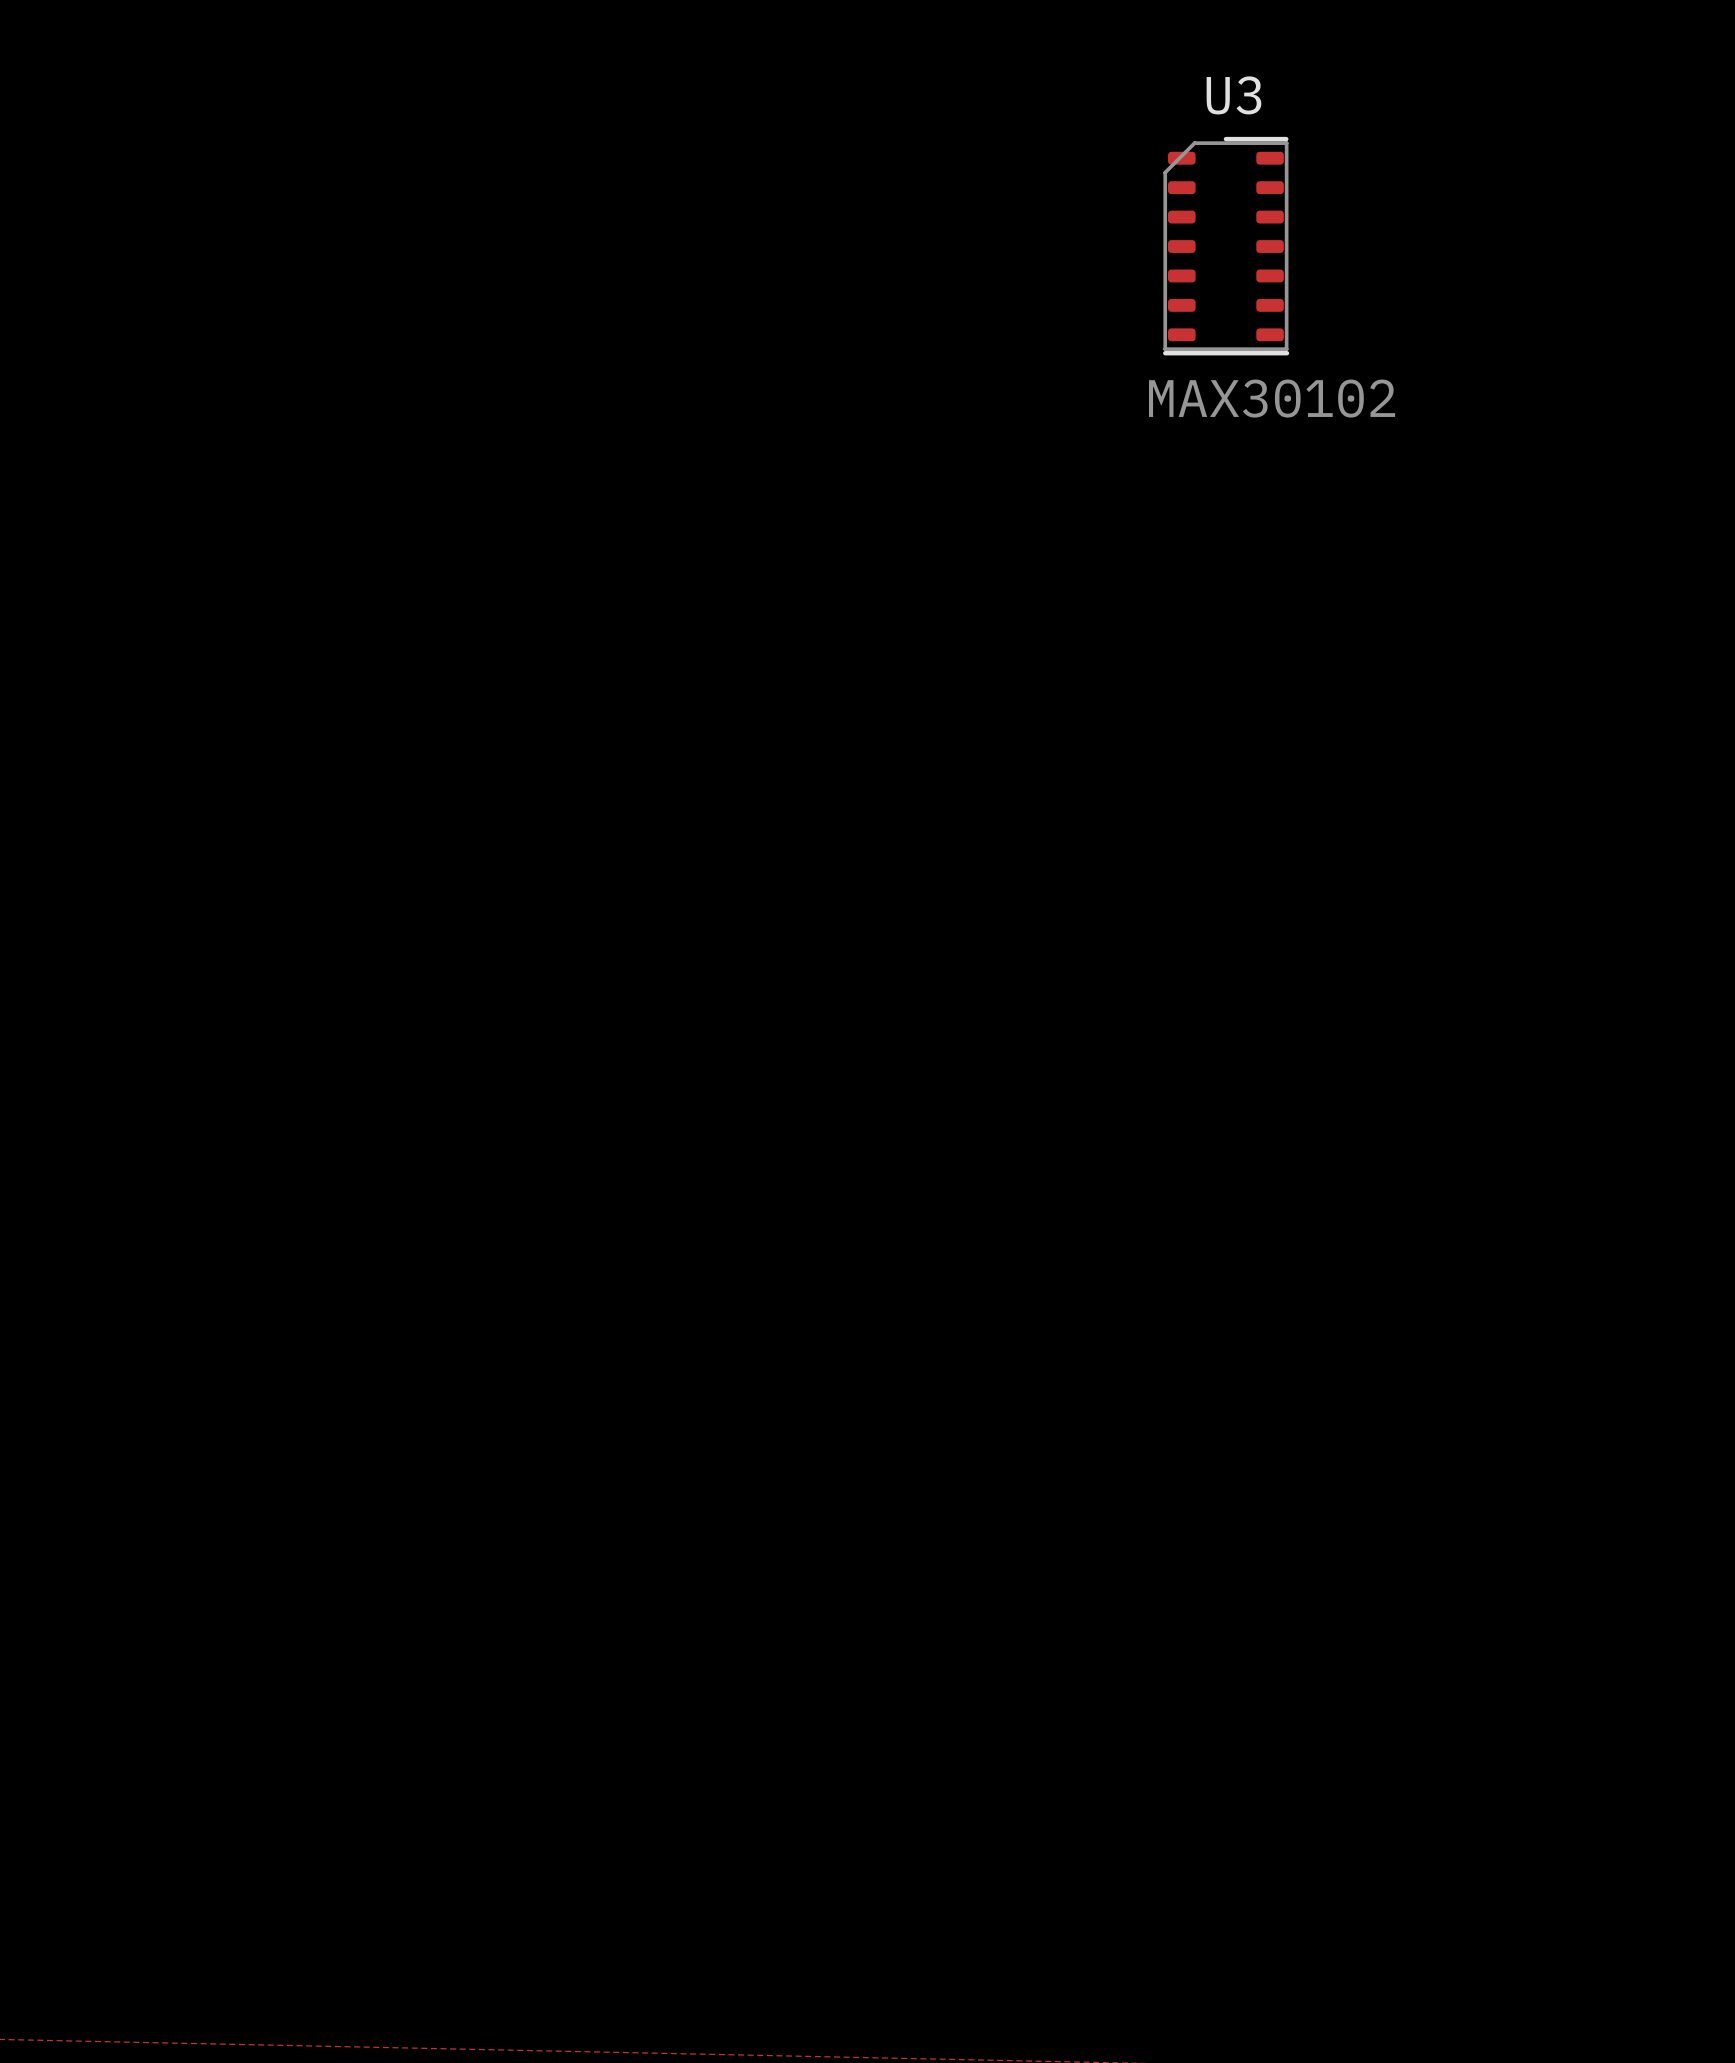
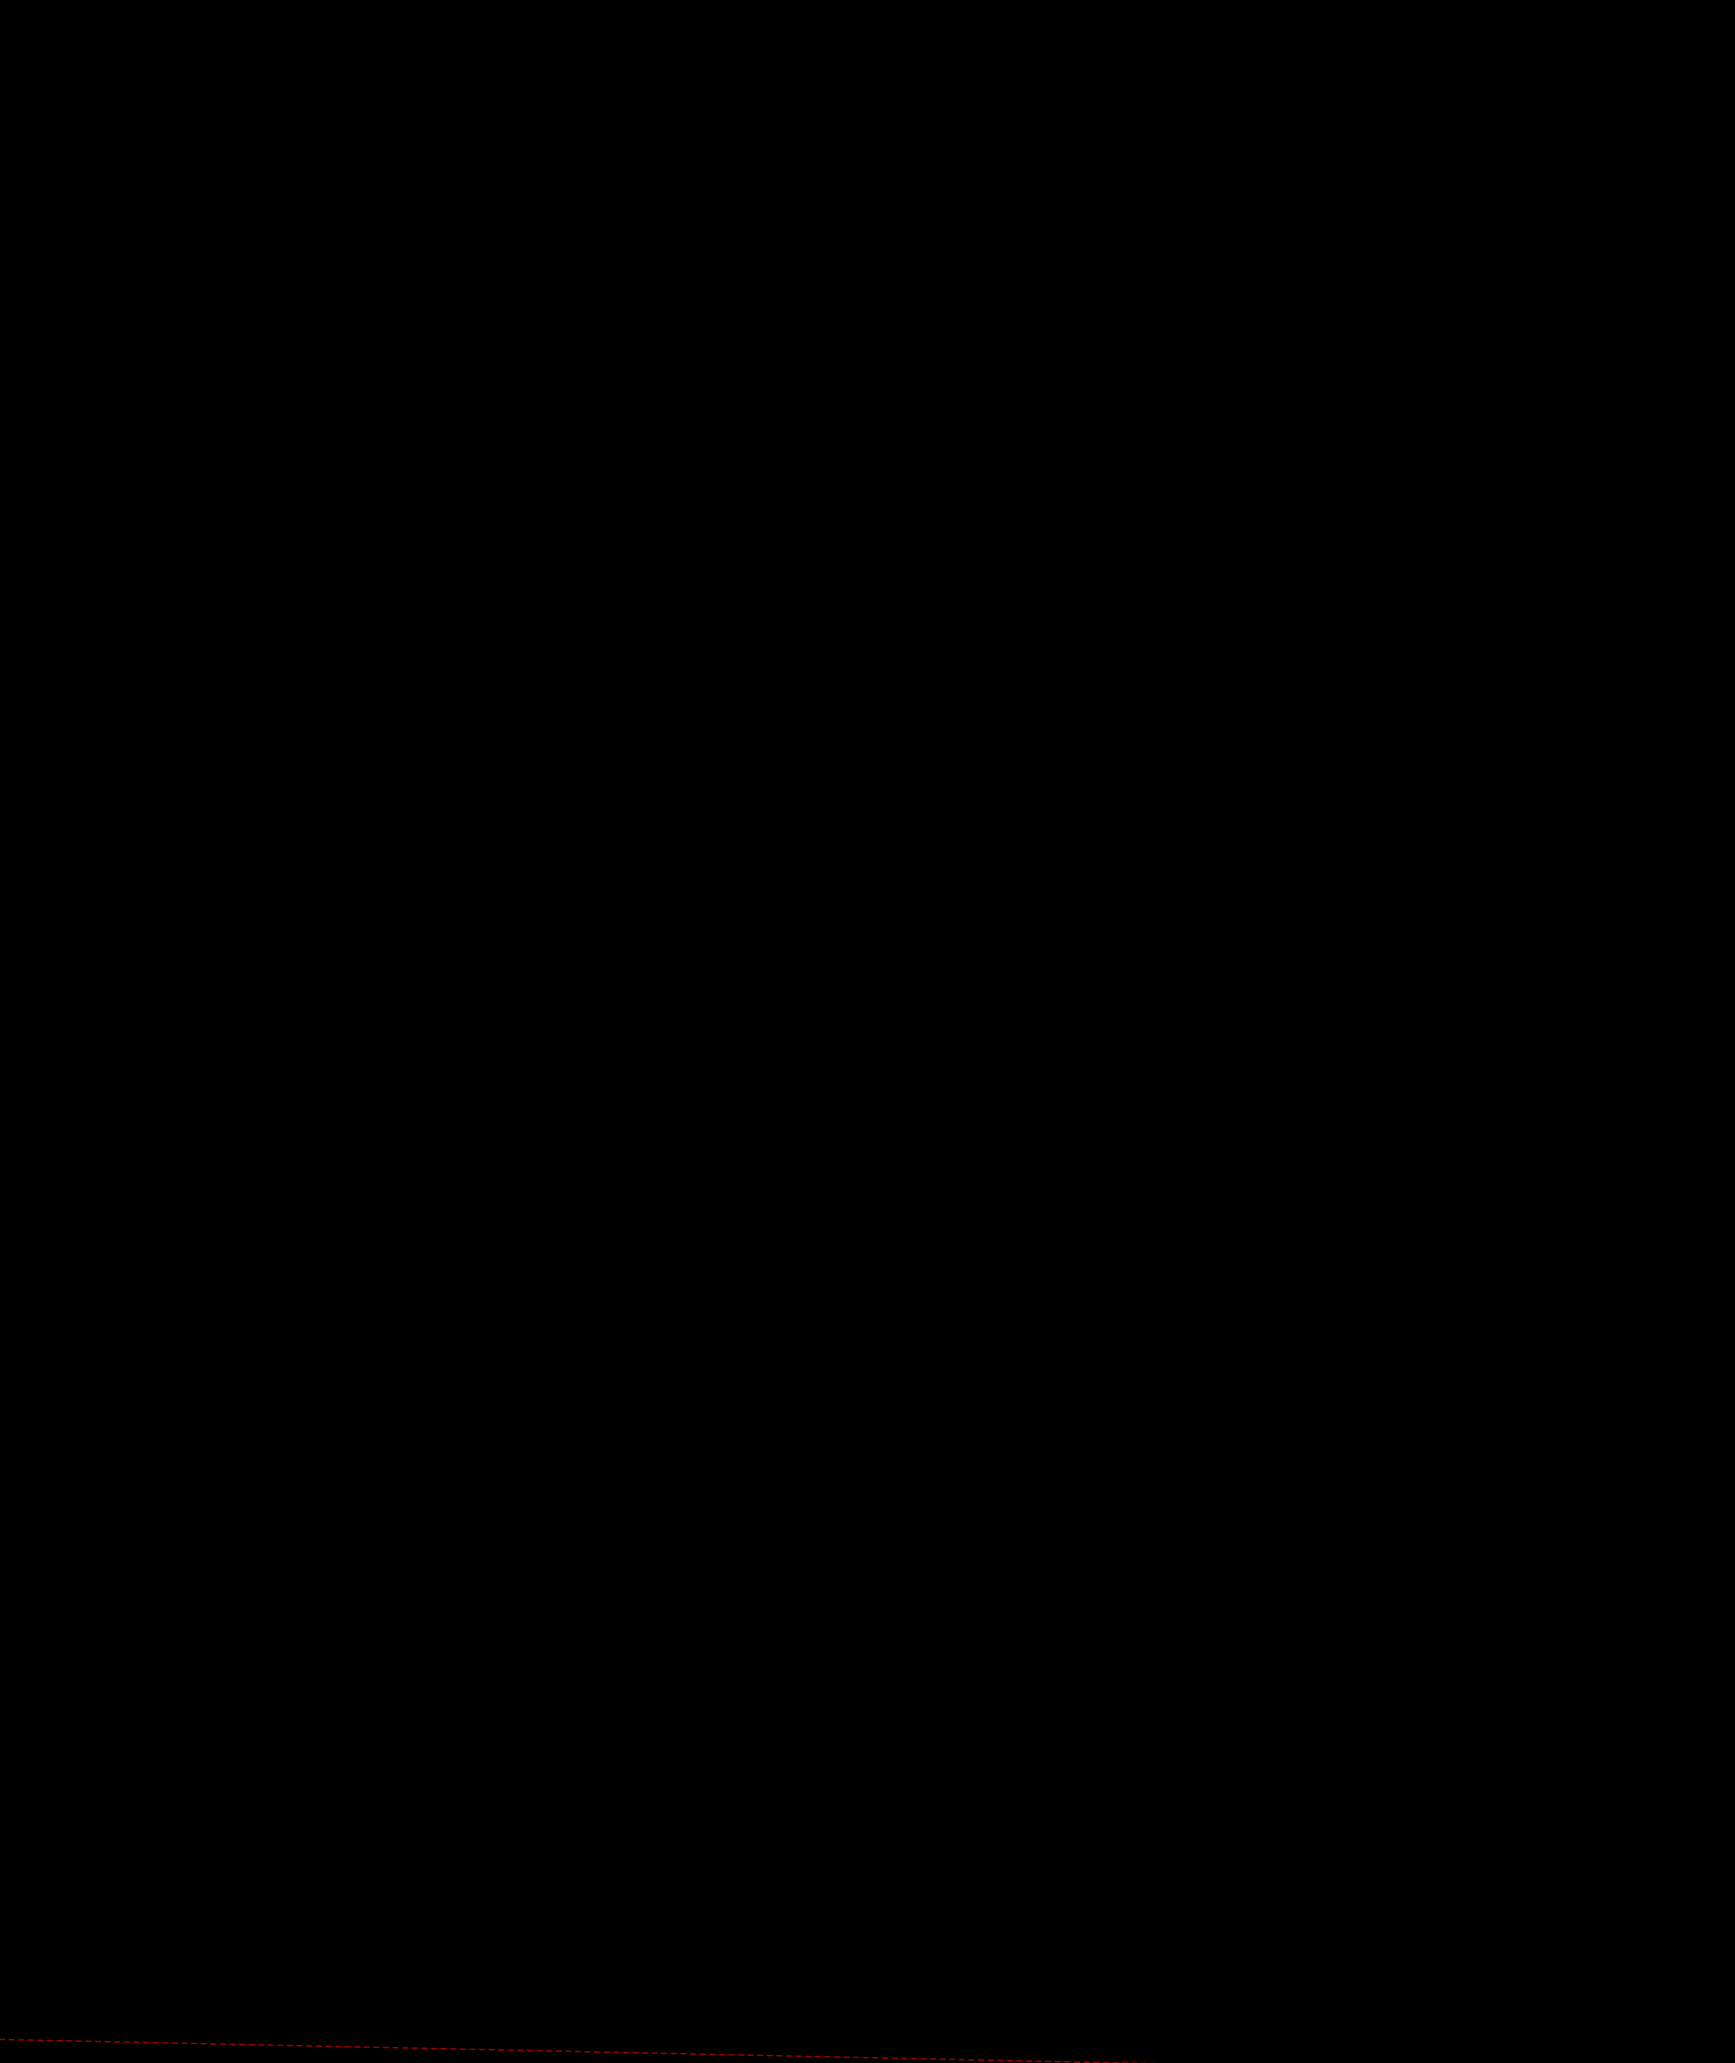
U3: MAX30102 (1226, 246) -> none

